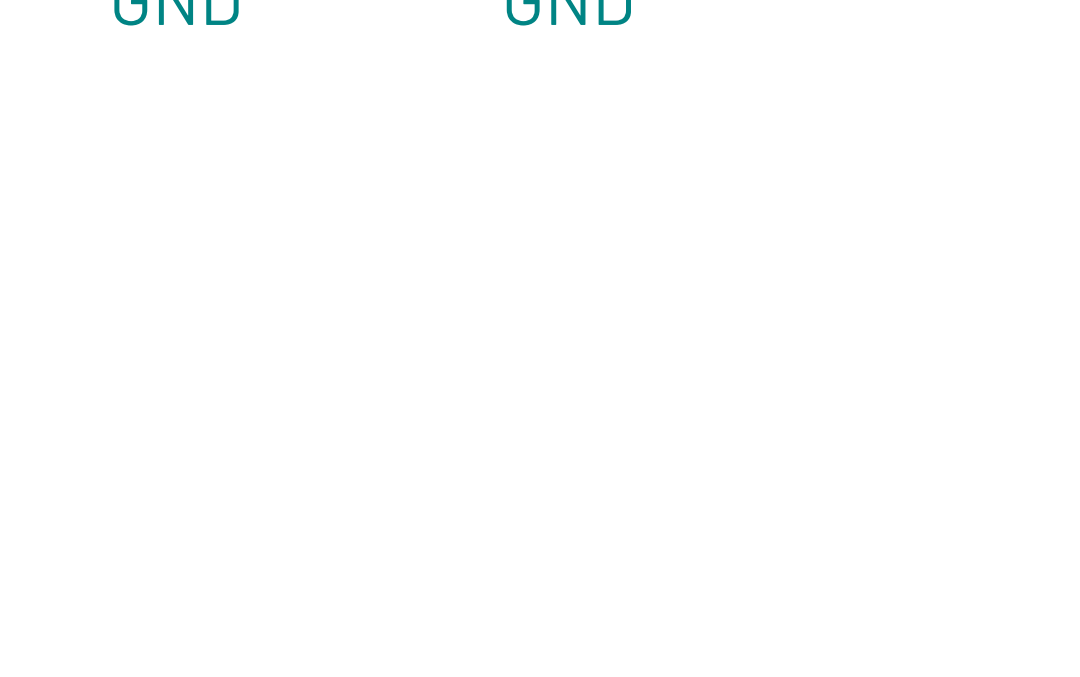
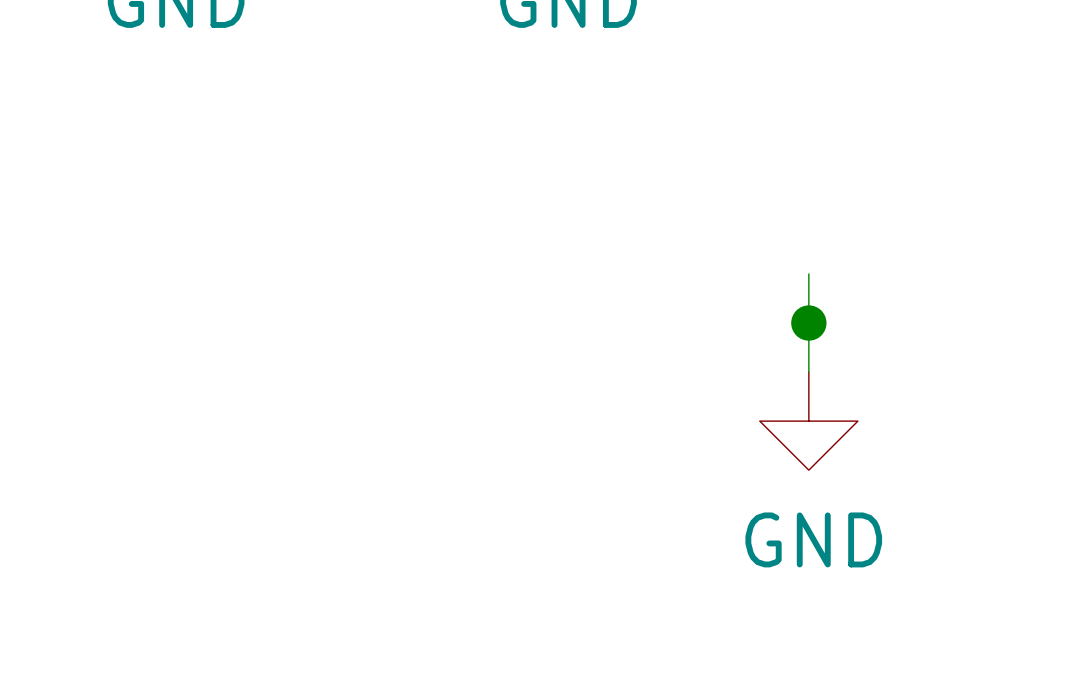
wire: none -> (808, 273) (808, 372)
junction: none -> (808, 323)
power symbol: none -> GND (808, 421)

